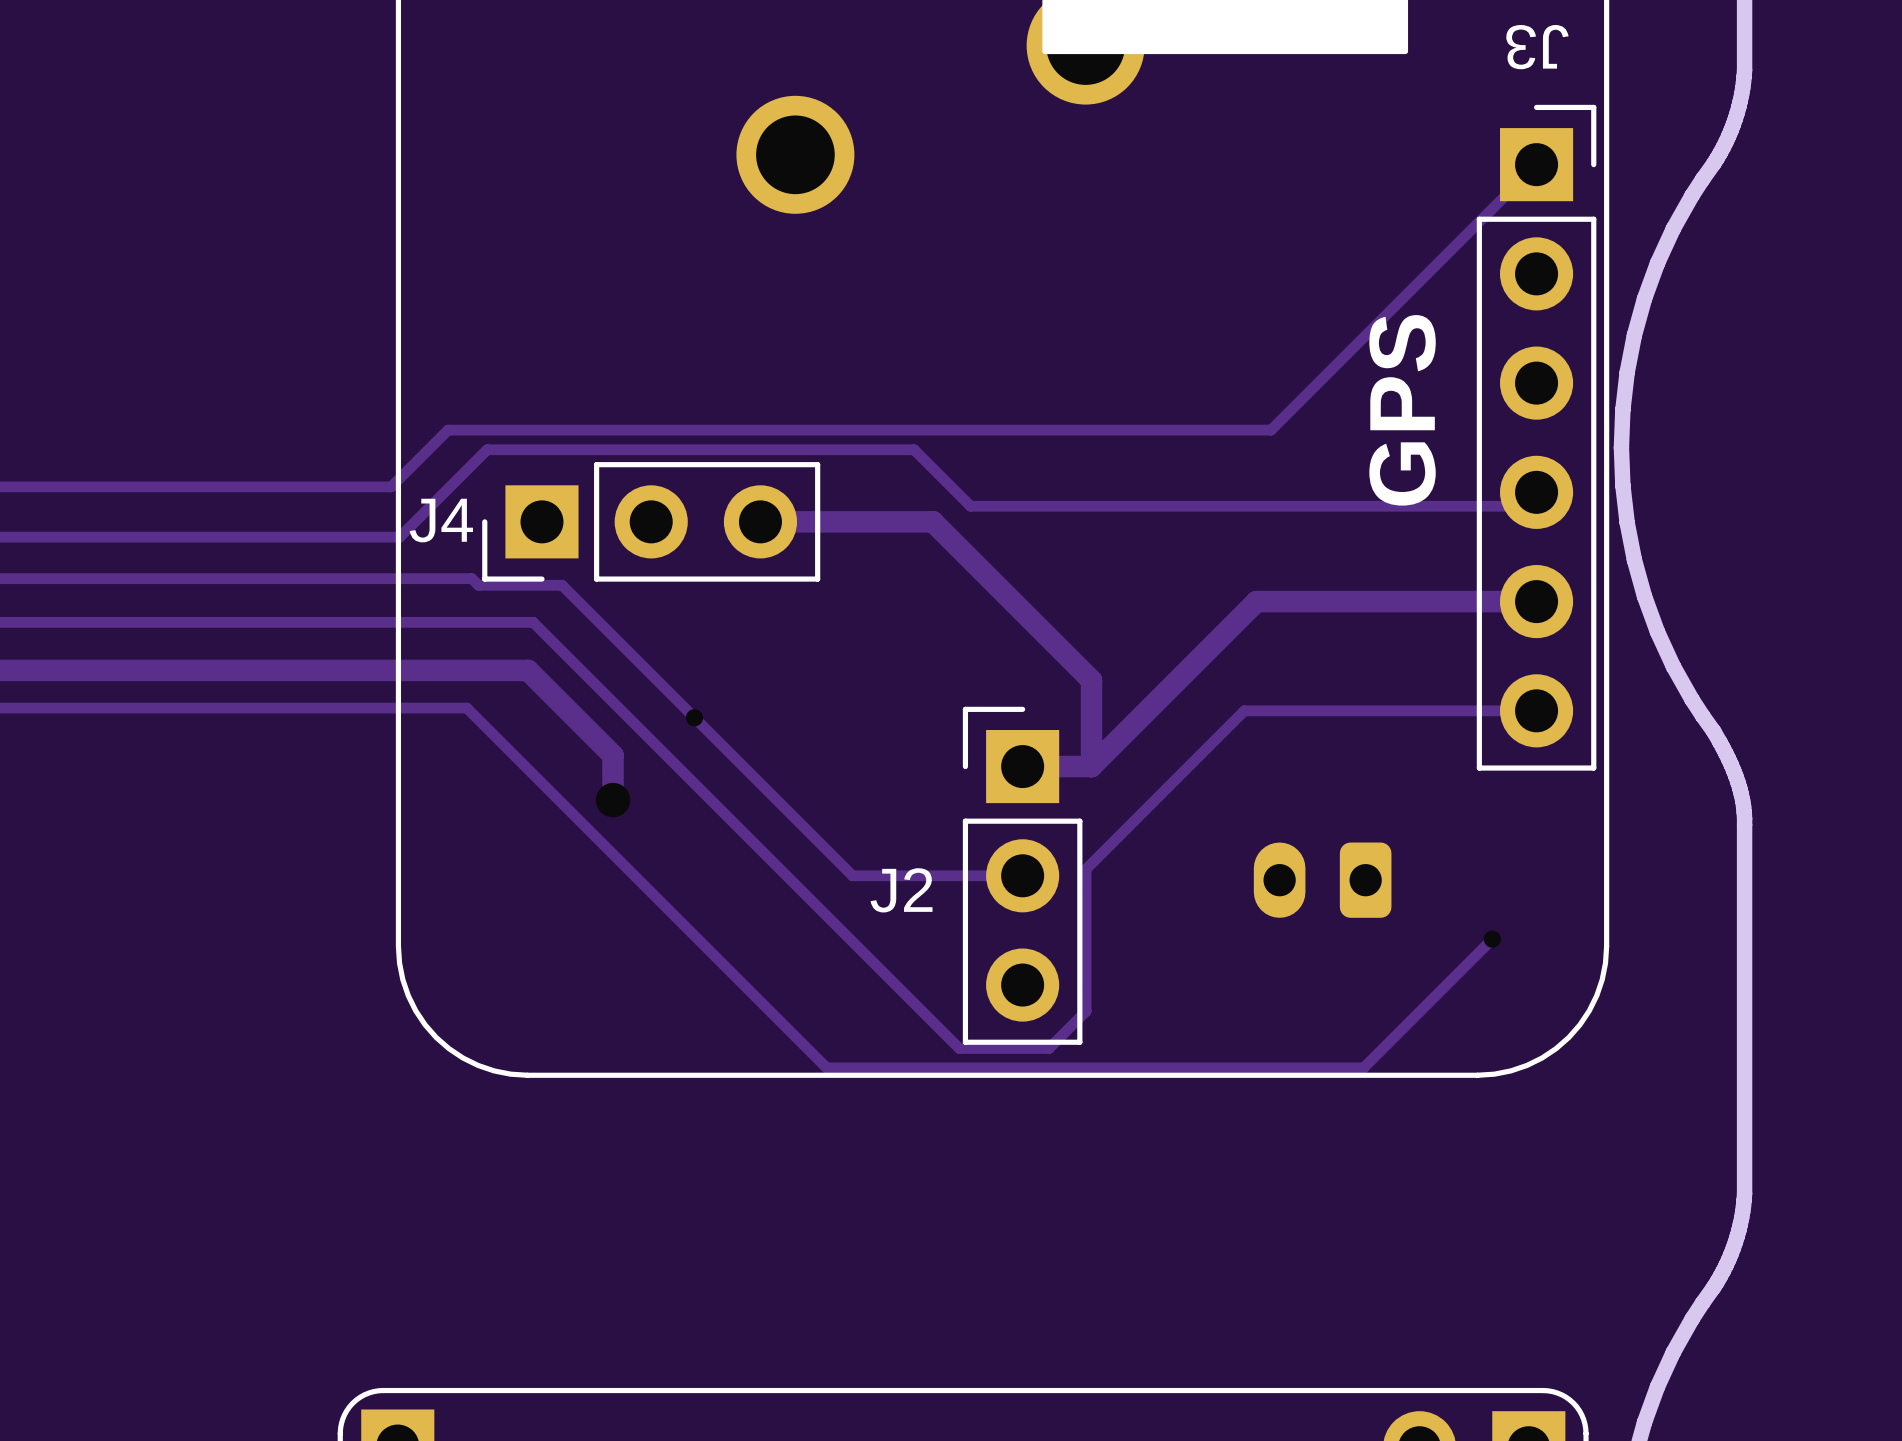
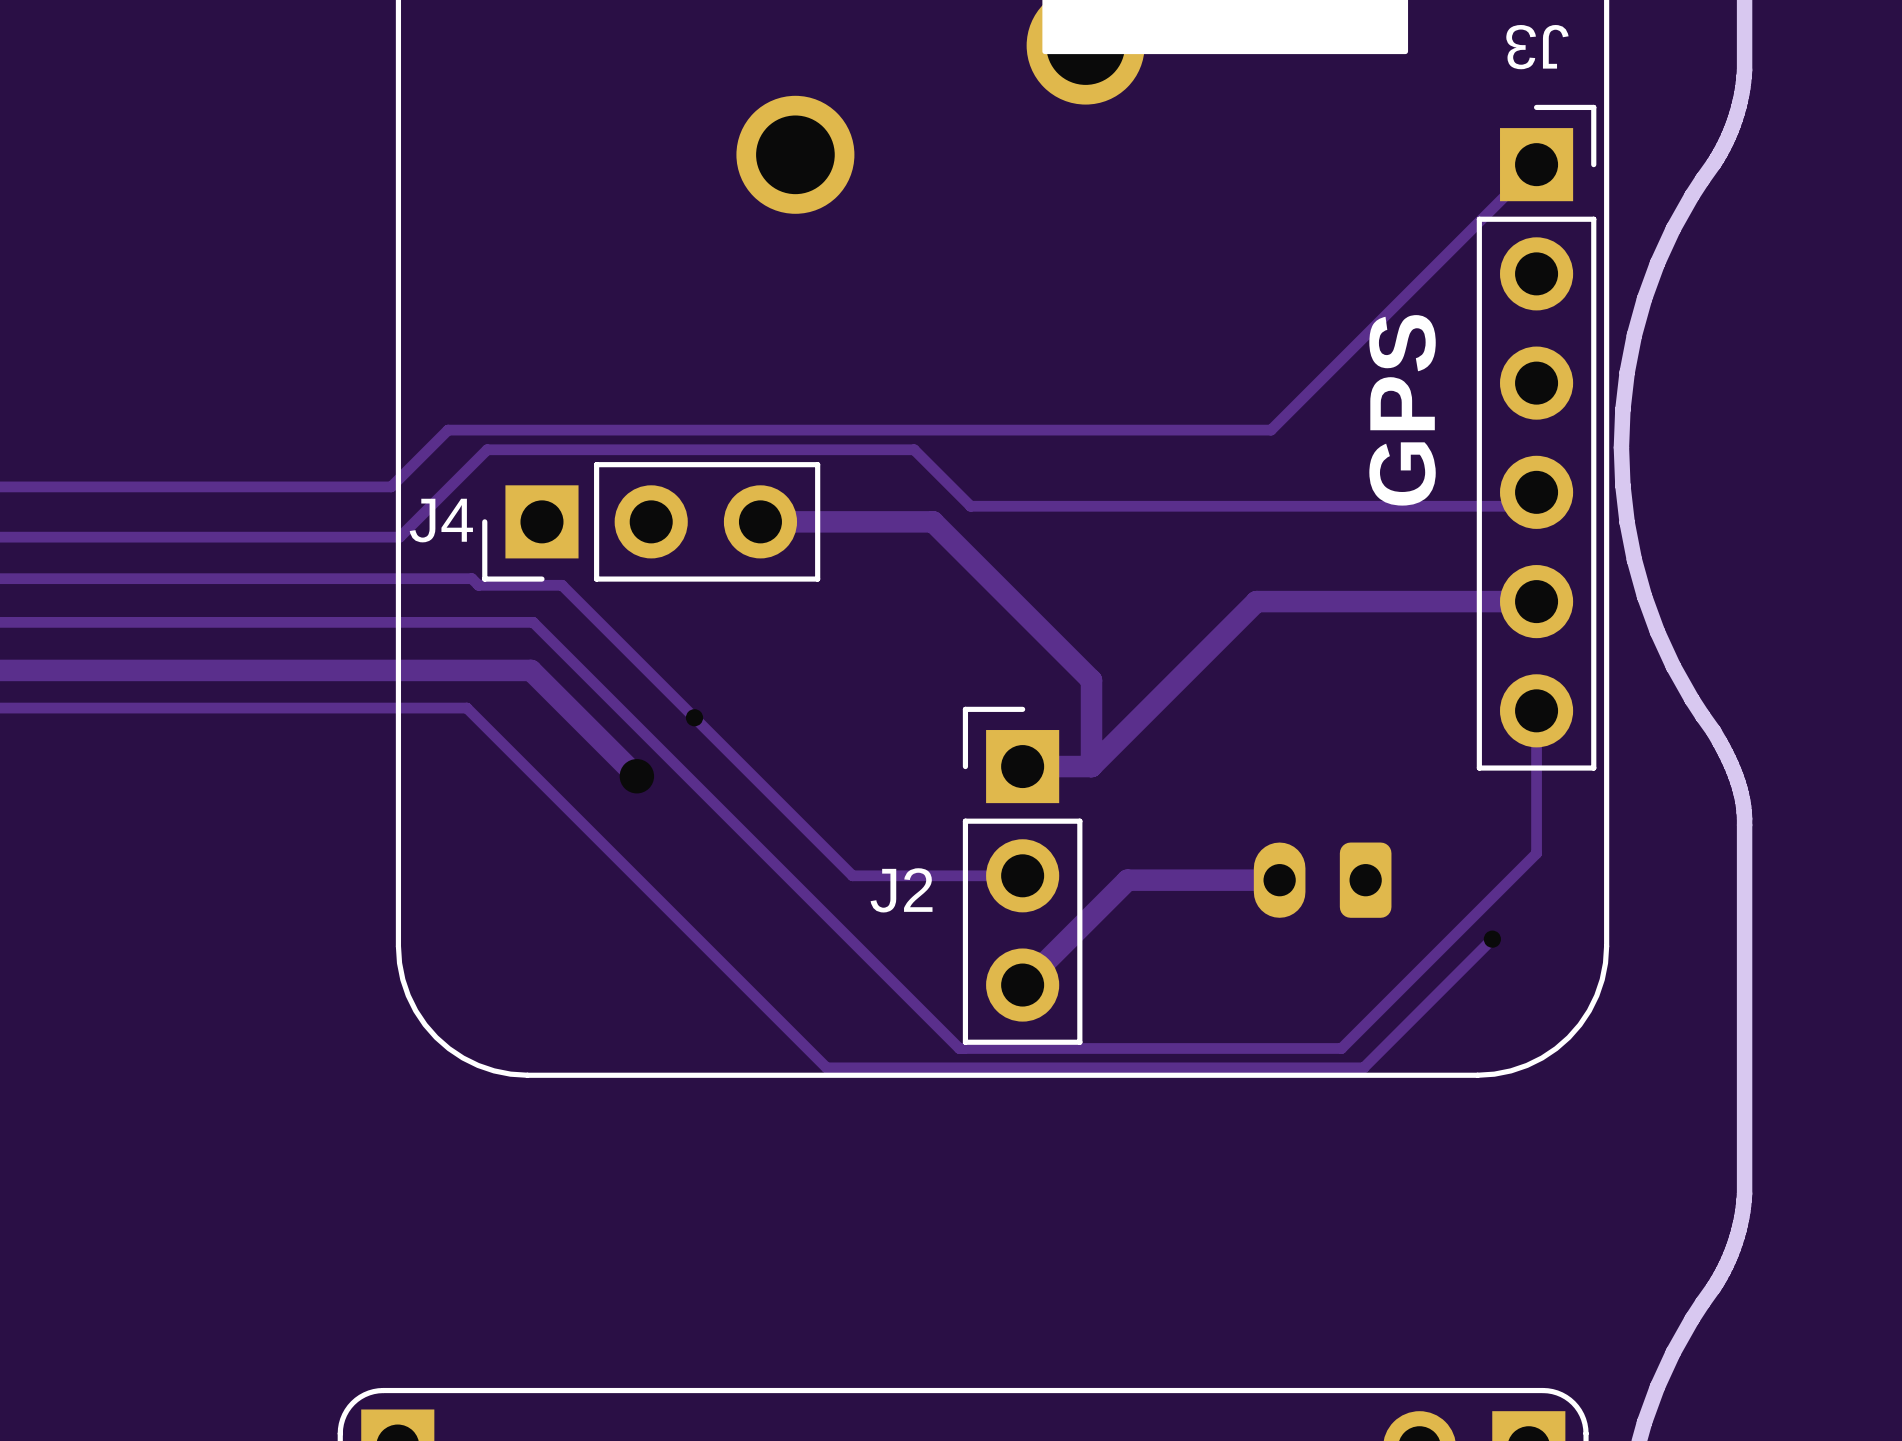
track: (528, 670) (613, 755) (613, 800) -> (528, 670) (531, 670) (636, 776)
track: (1536, 710) (1244, 710) (1086, 869) (1086, 1011) (1048, 1048) -> (1536, 710) (1536, 853) (1341, 1048) (1048, 1048)
via position: (613, 800) -> (636, 776)
track: none -> (1279, 880) (1127, 880) (1022, 985)

